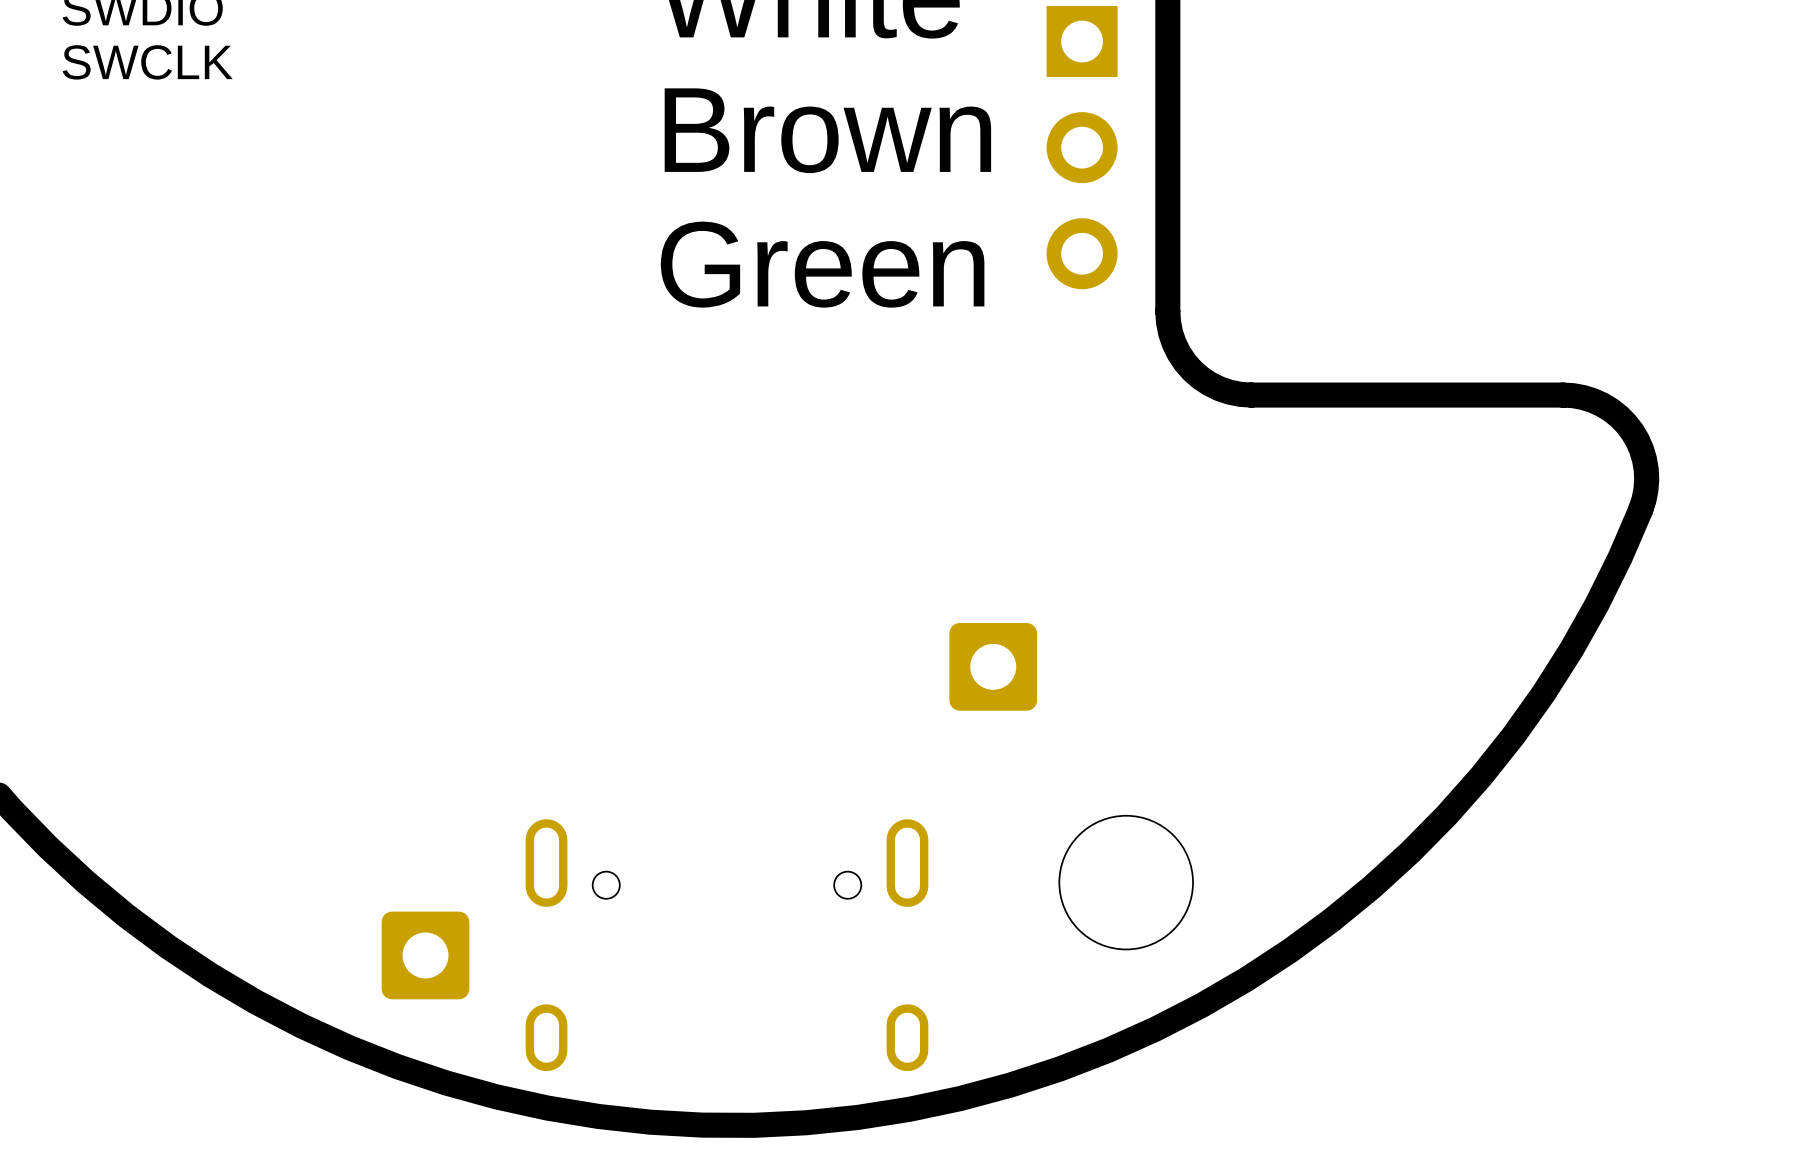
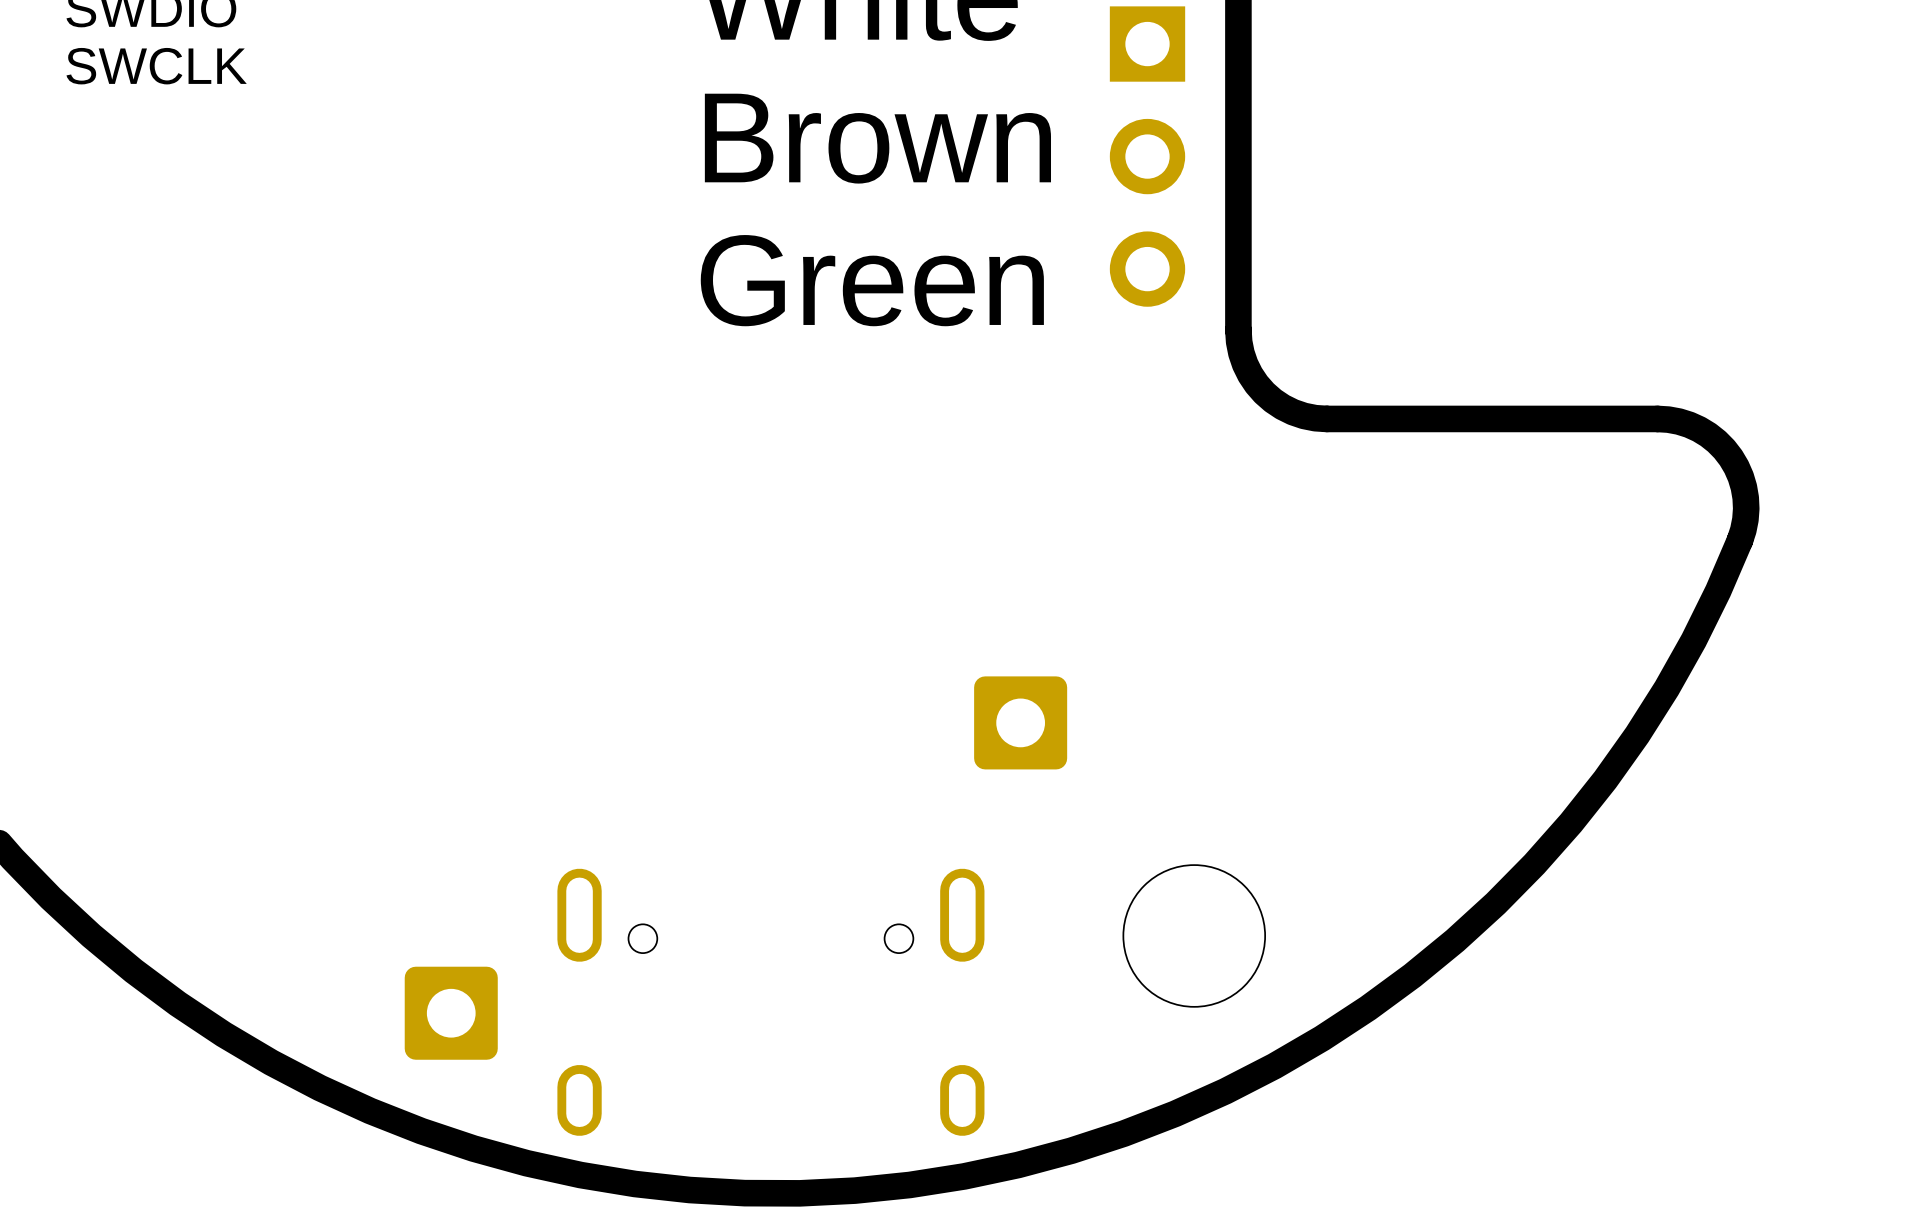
part position: (993, 666) -> (1020, 722)

